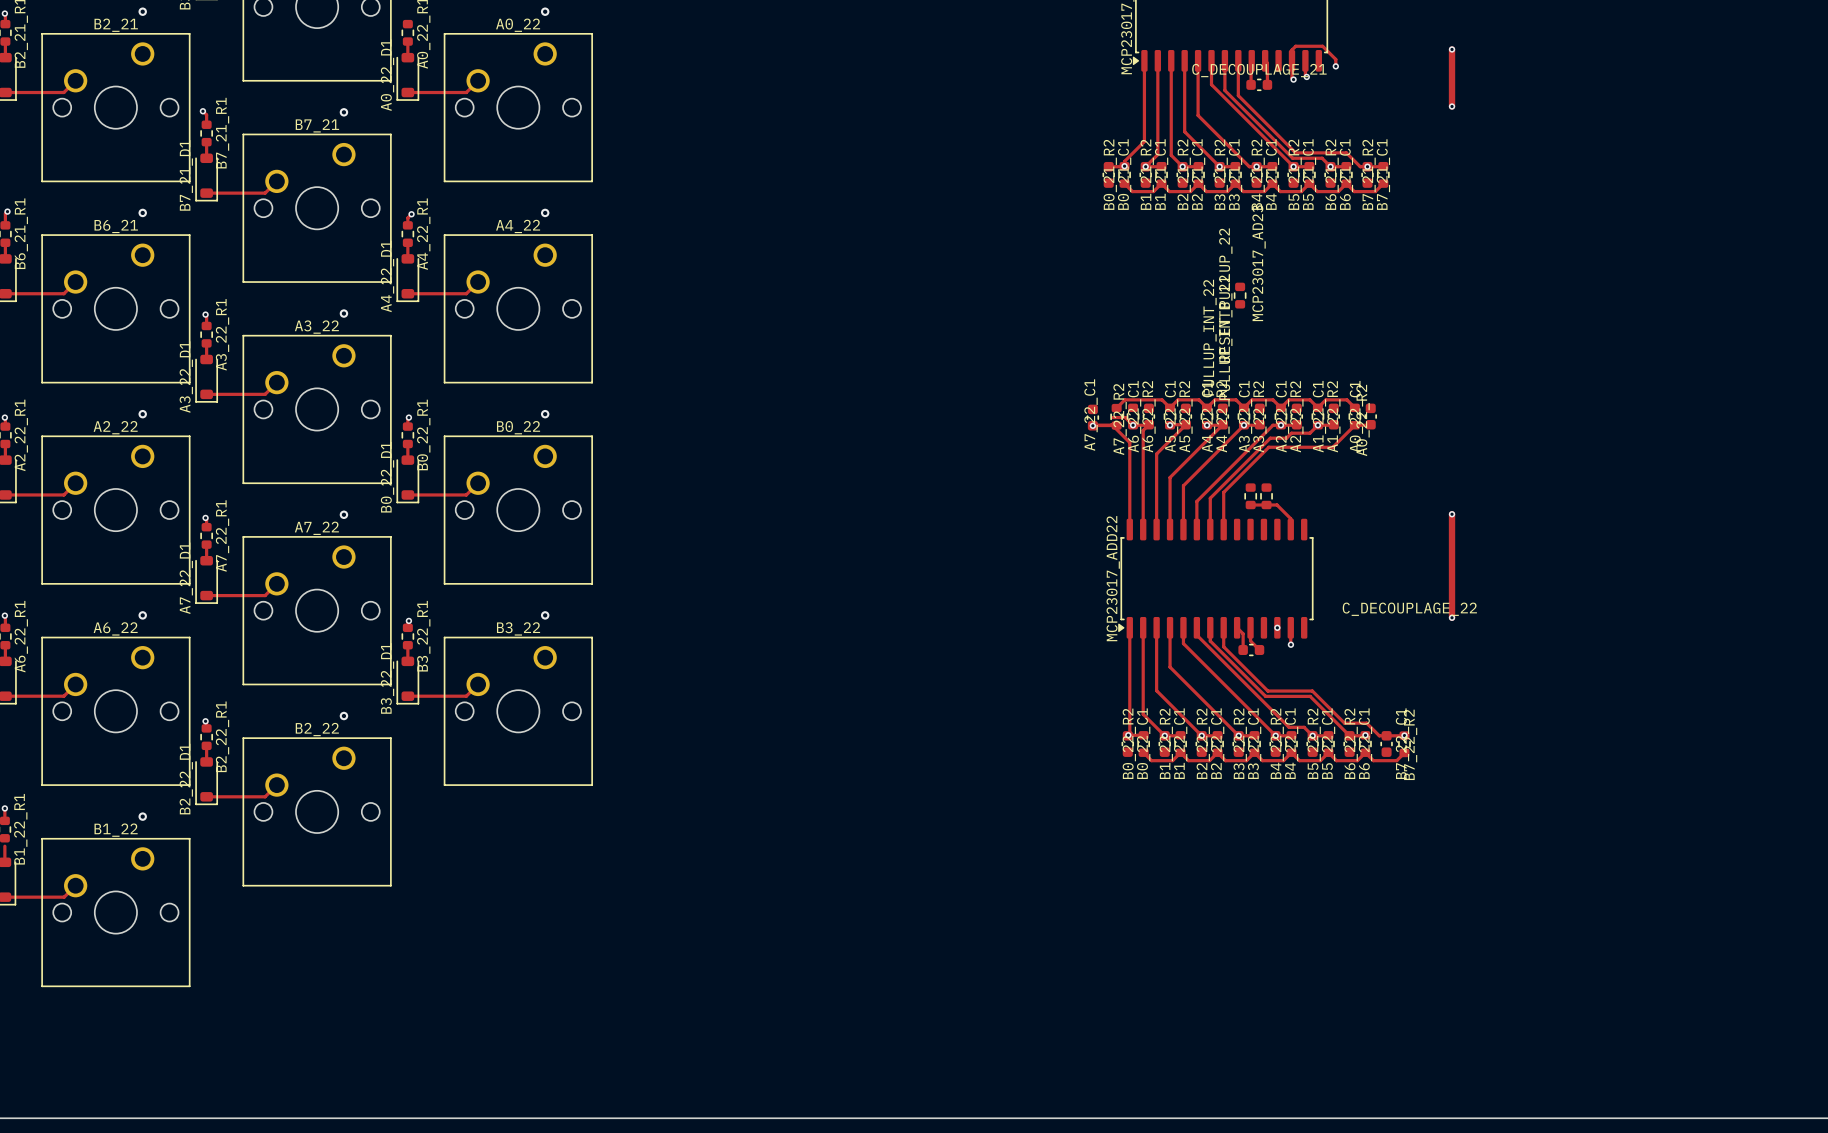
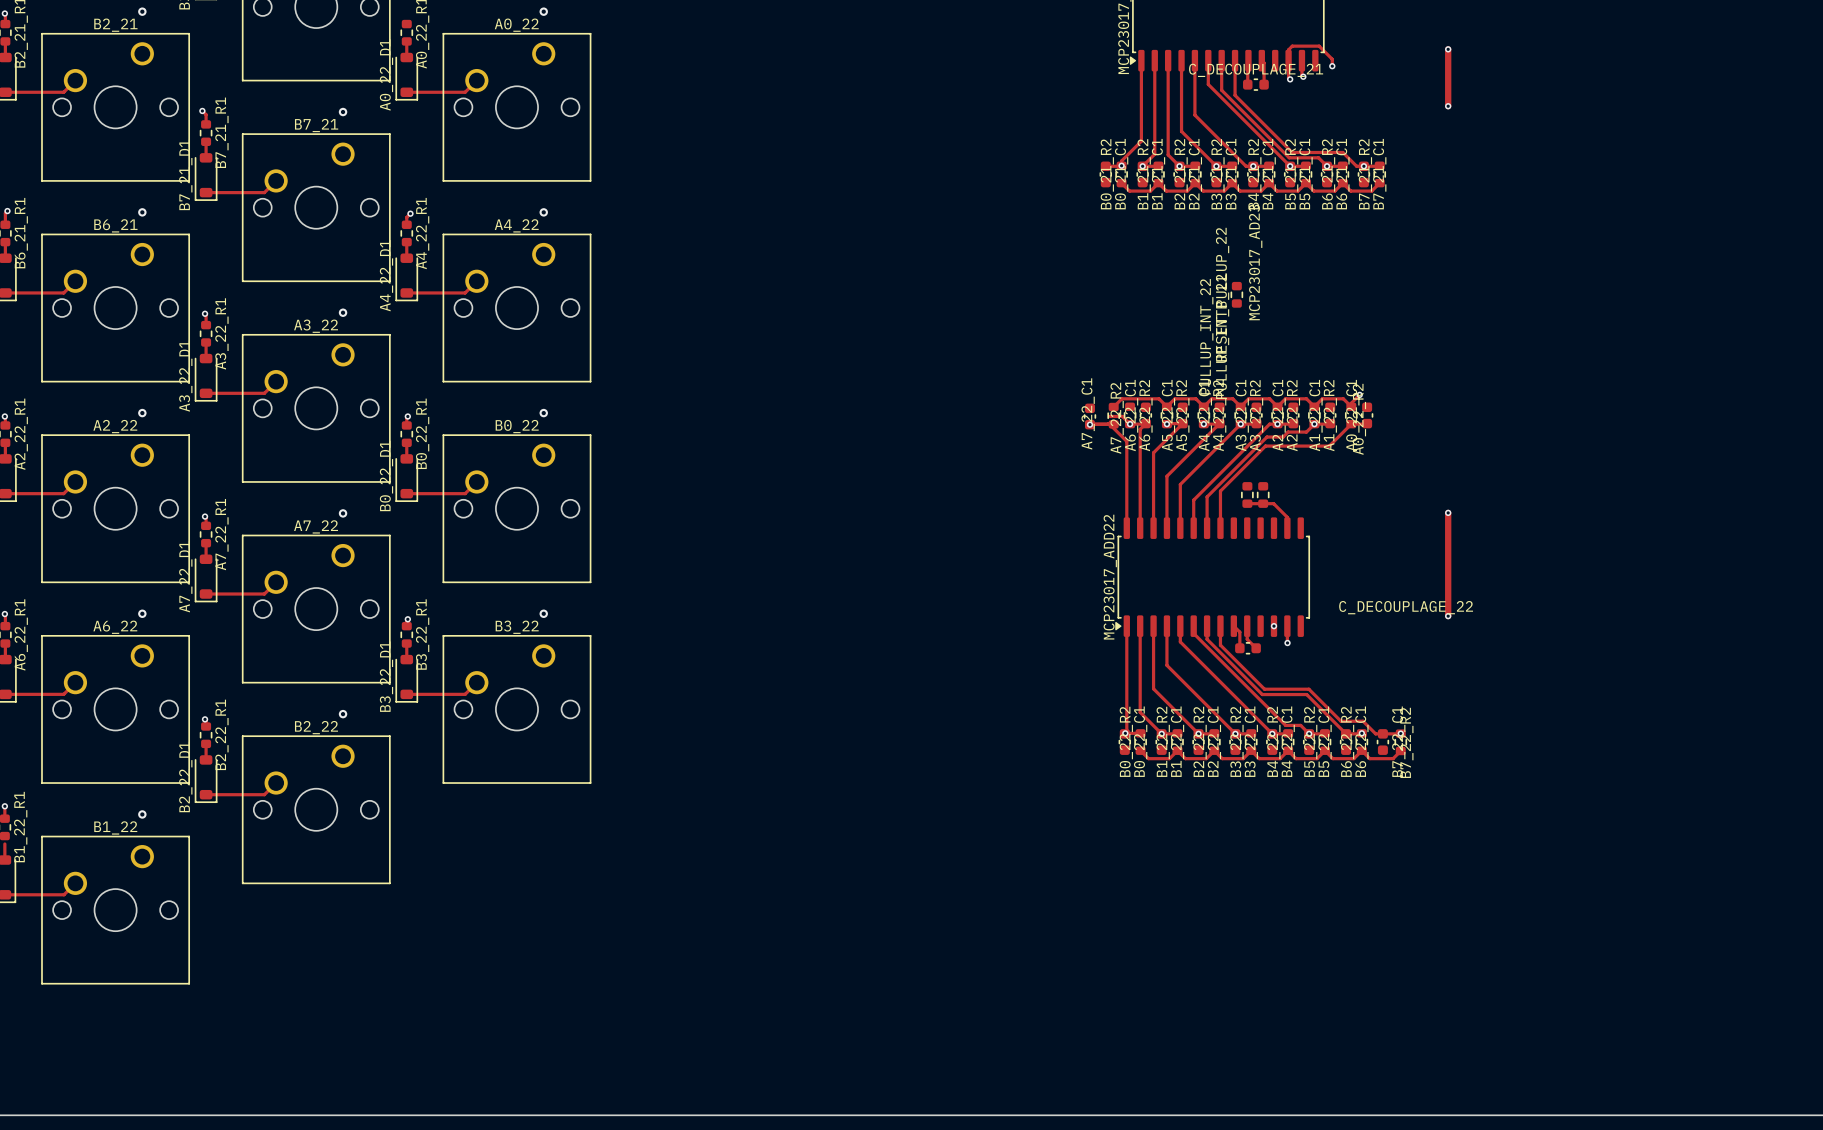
track: none -> (1359, 394) (1351, 403) (1351, 406)
via: none -> (1359, 394)

